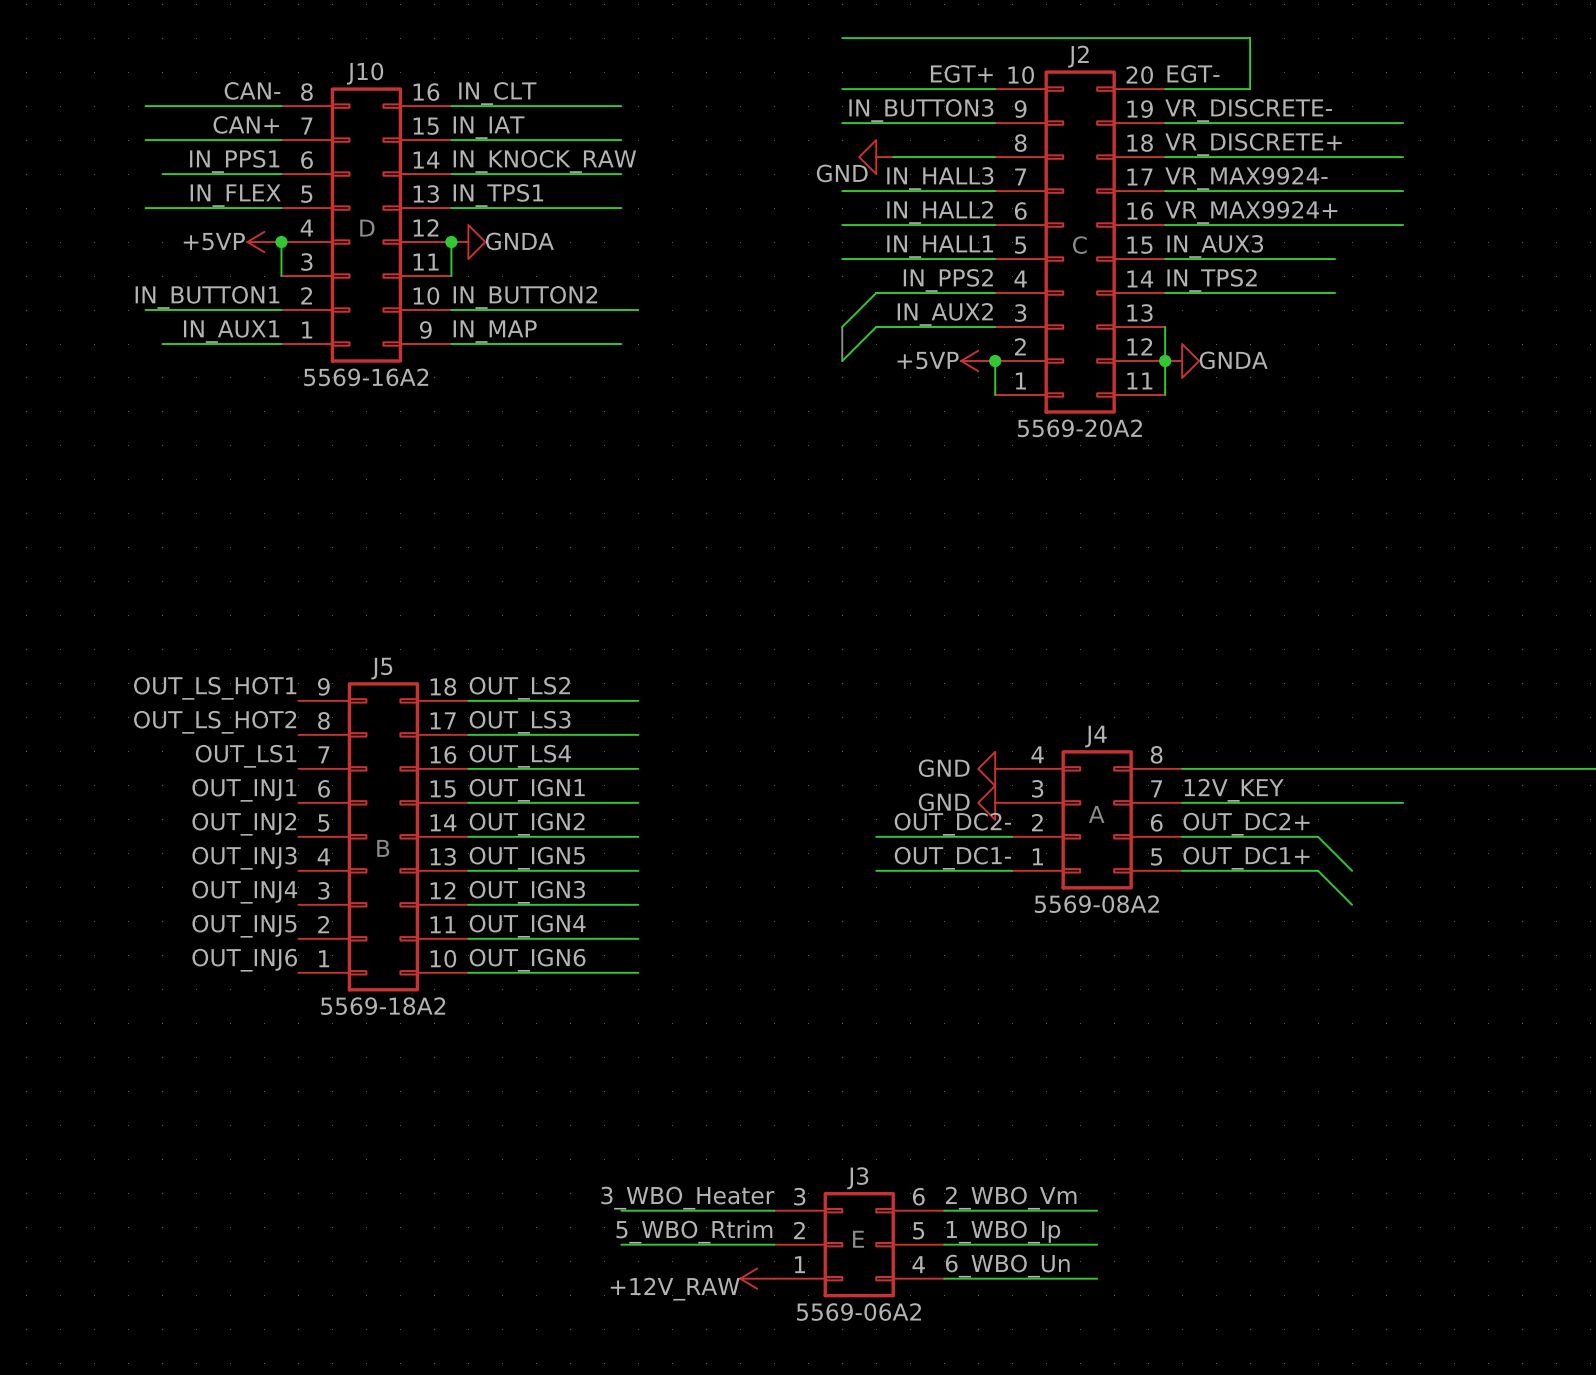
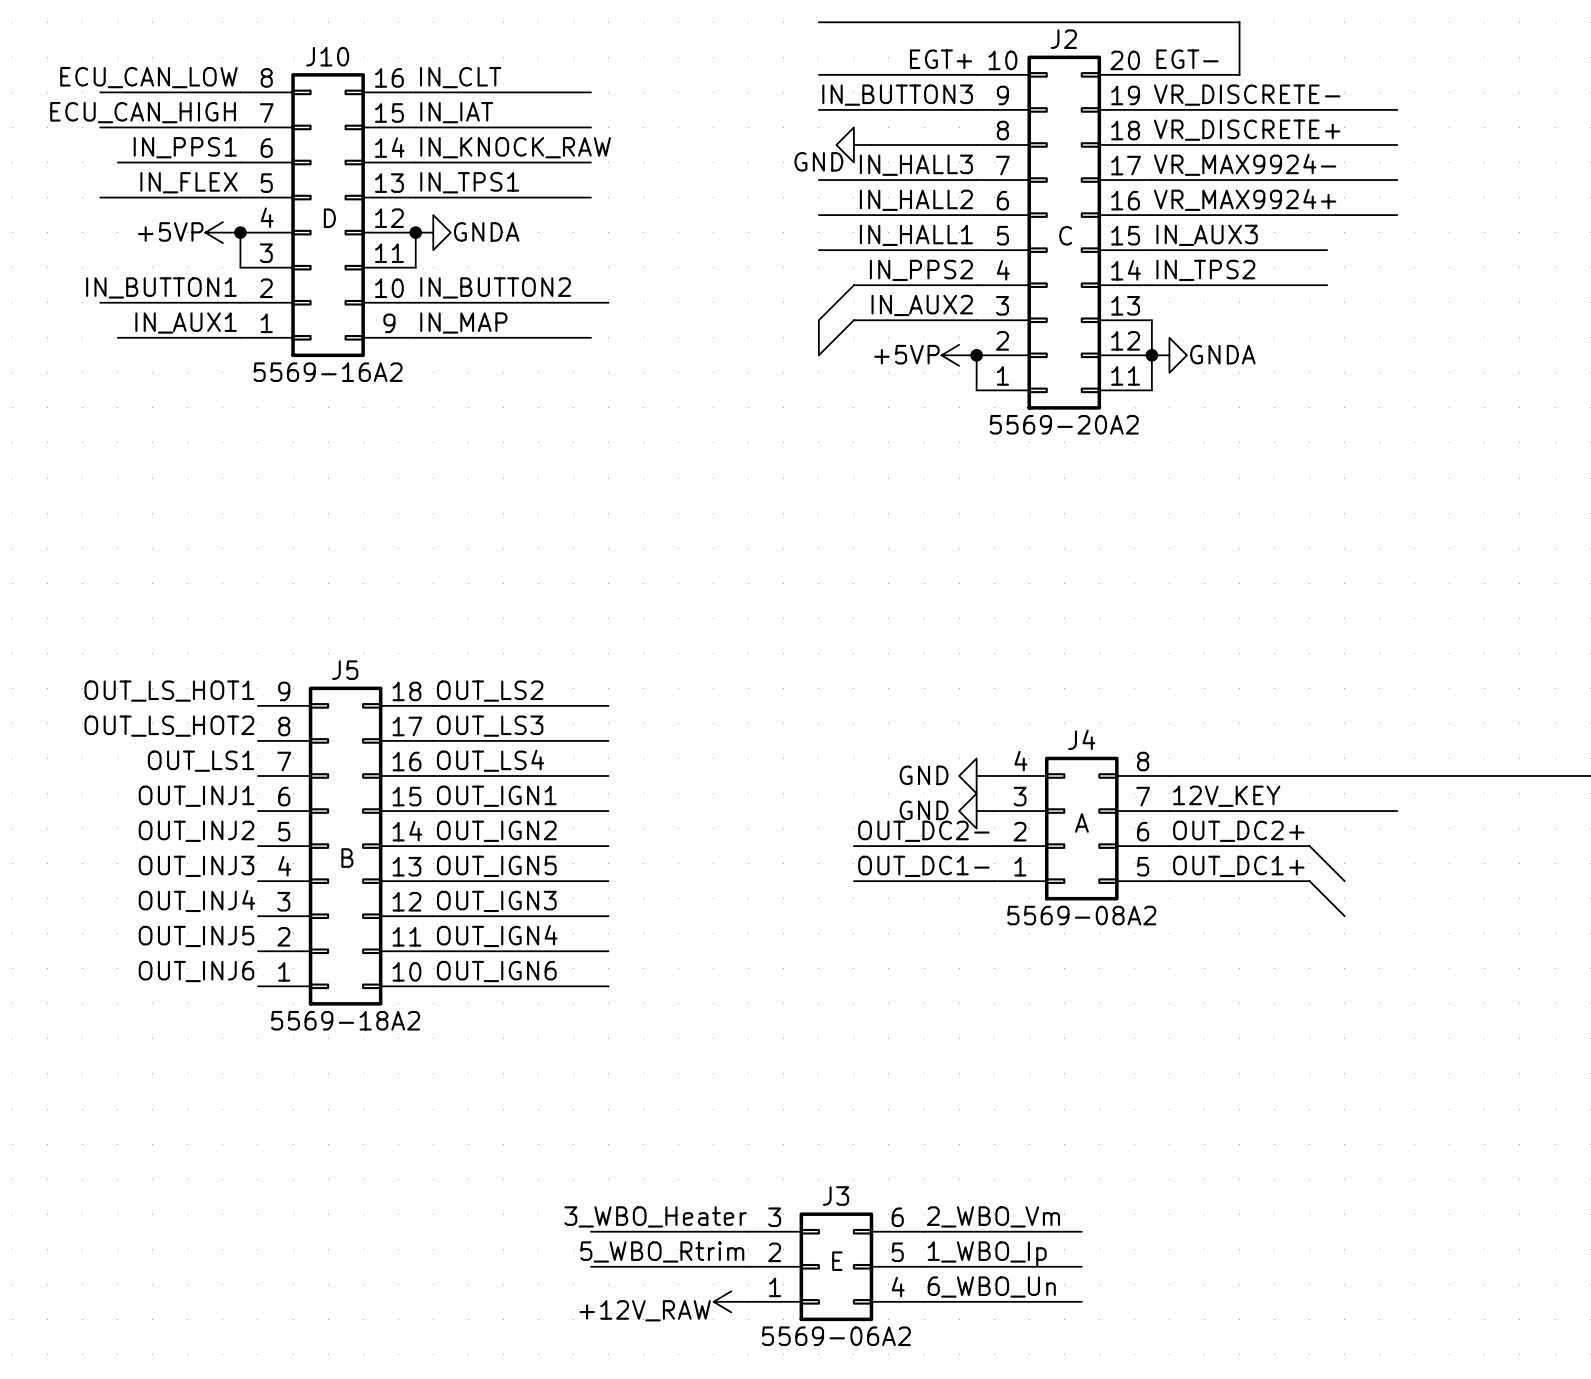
label: CAN- (252, 90) -> ECU_CAN_LOW (148, 77)
label: CAN+ (246, 124) -> ECU_CAN_HIGH (143, 112)

